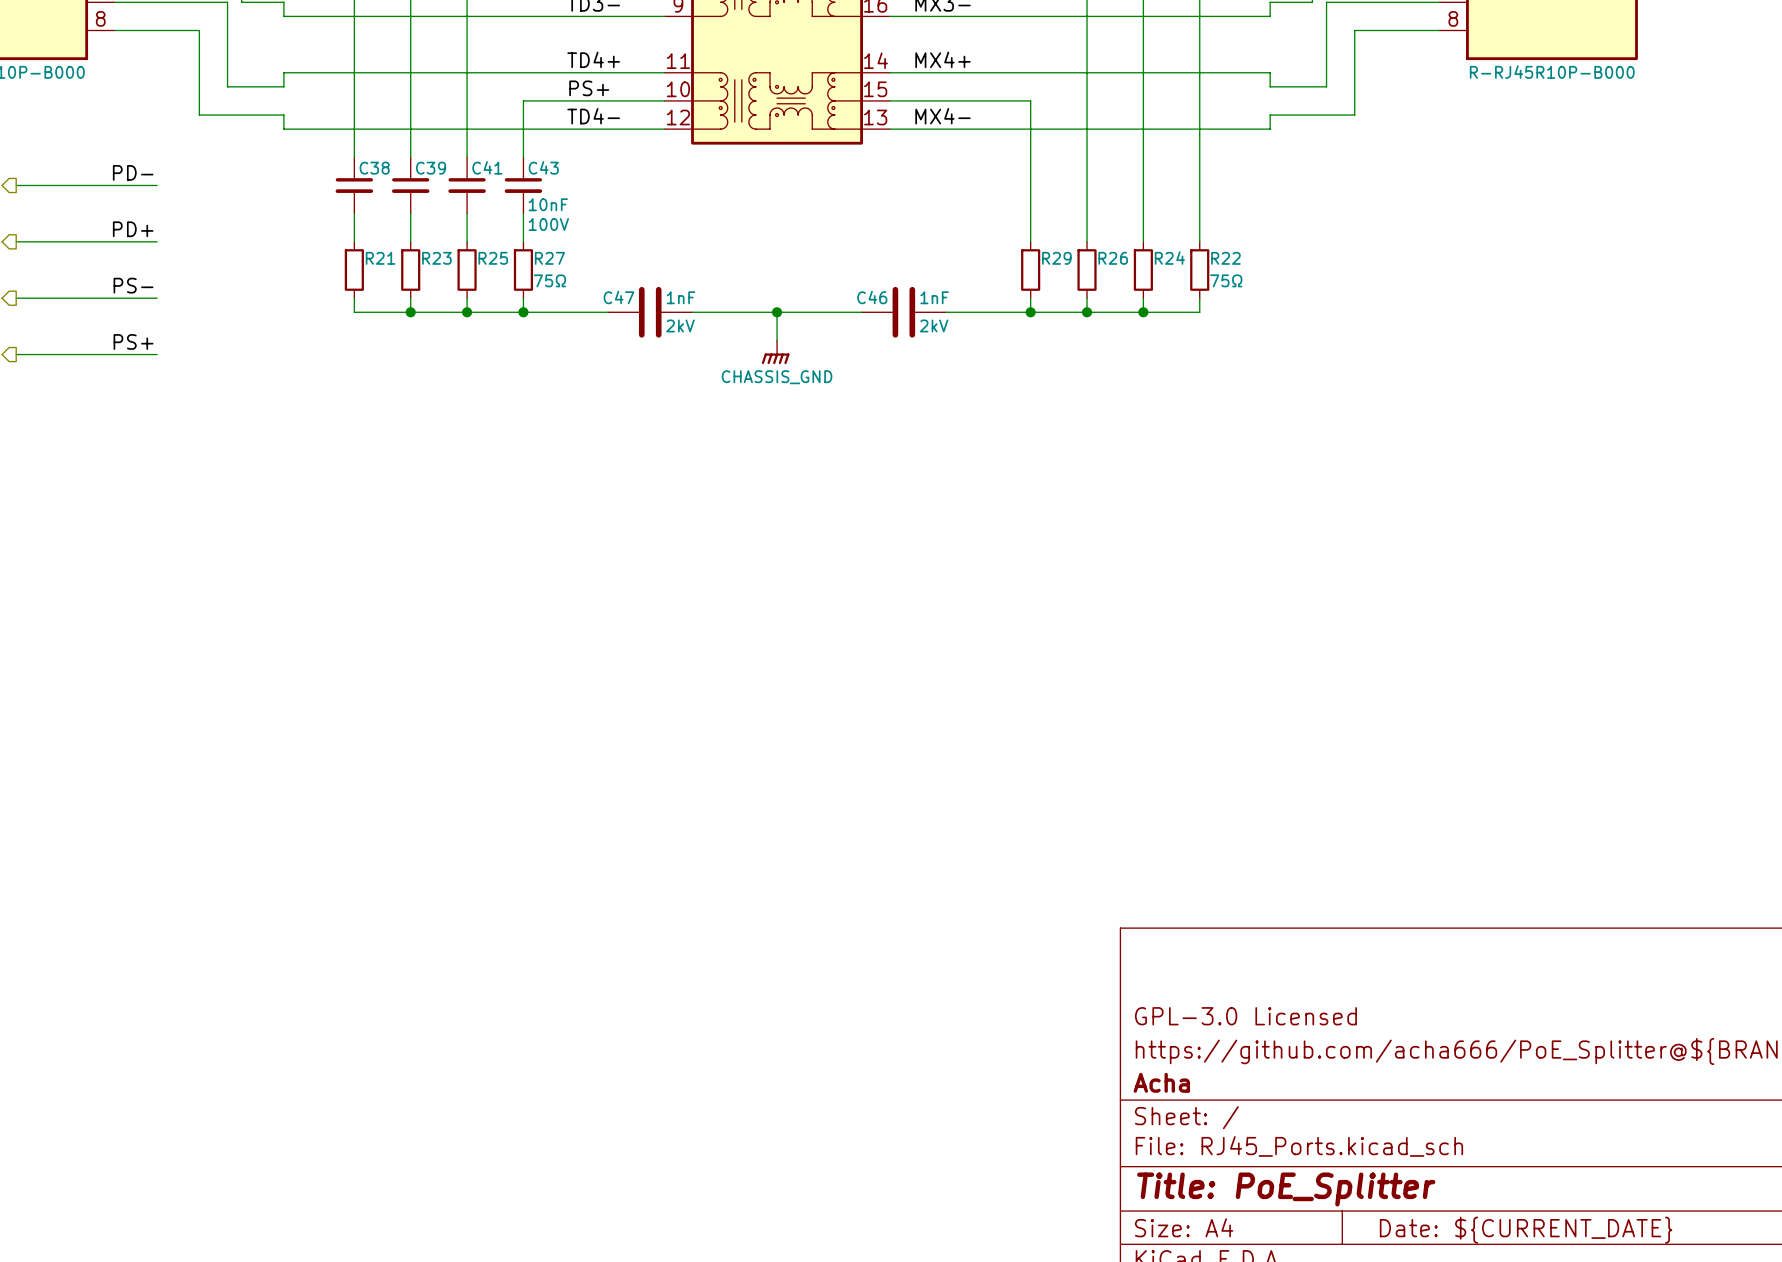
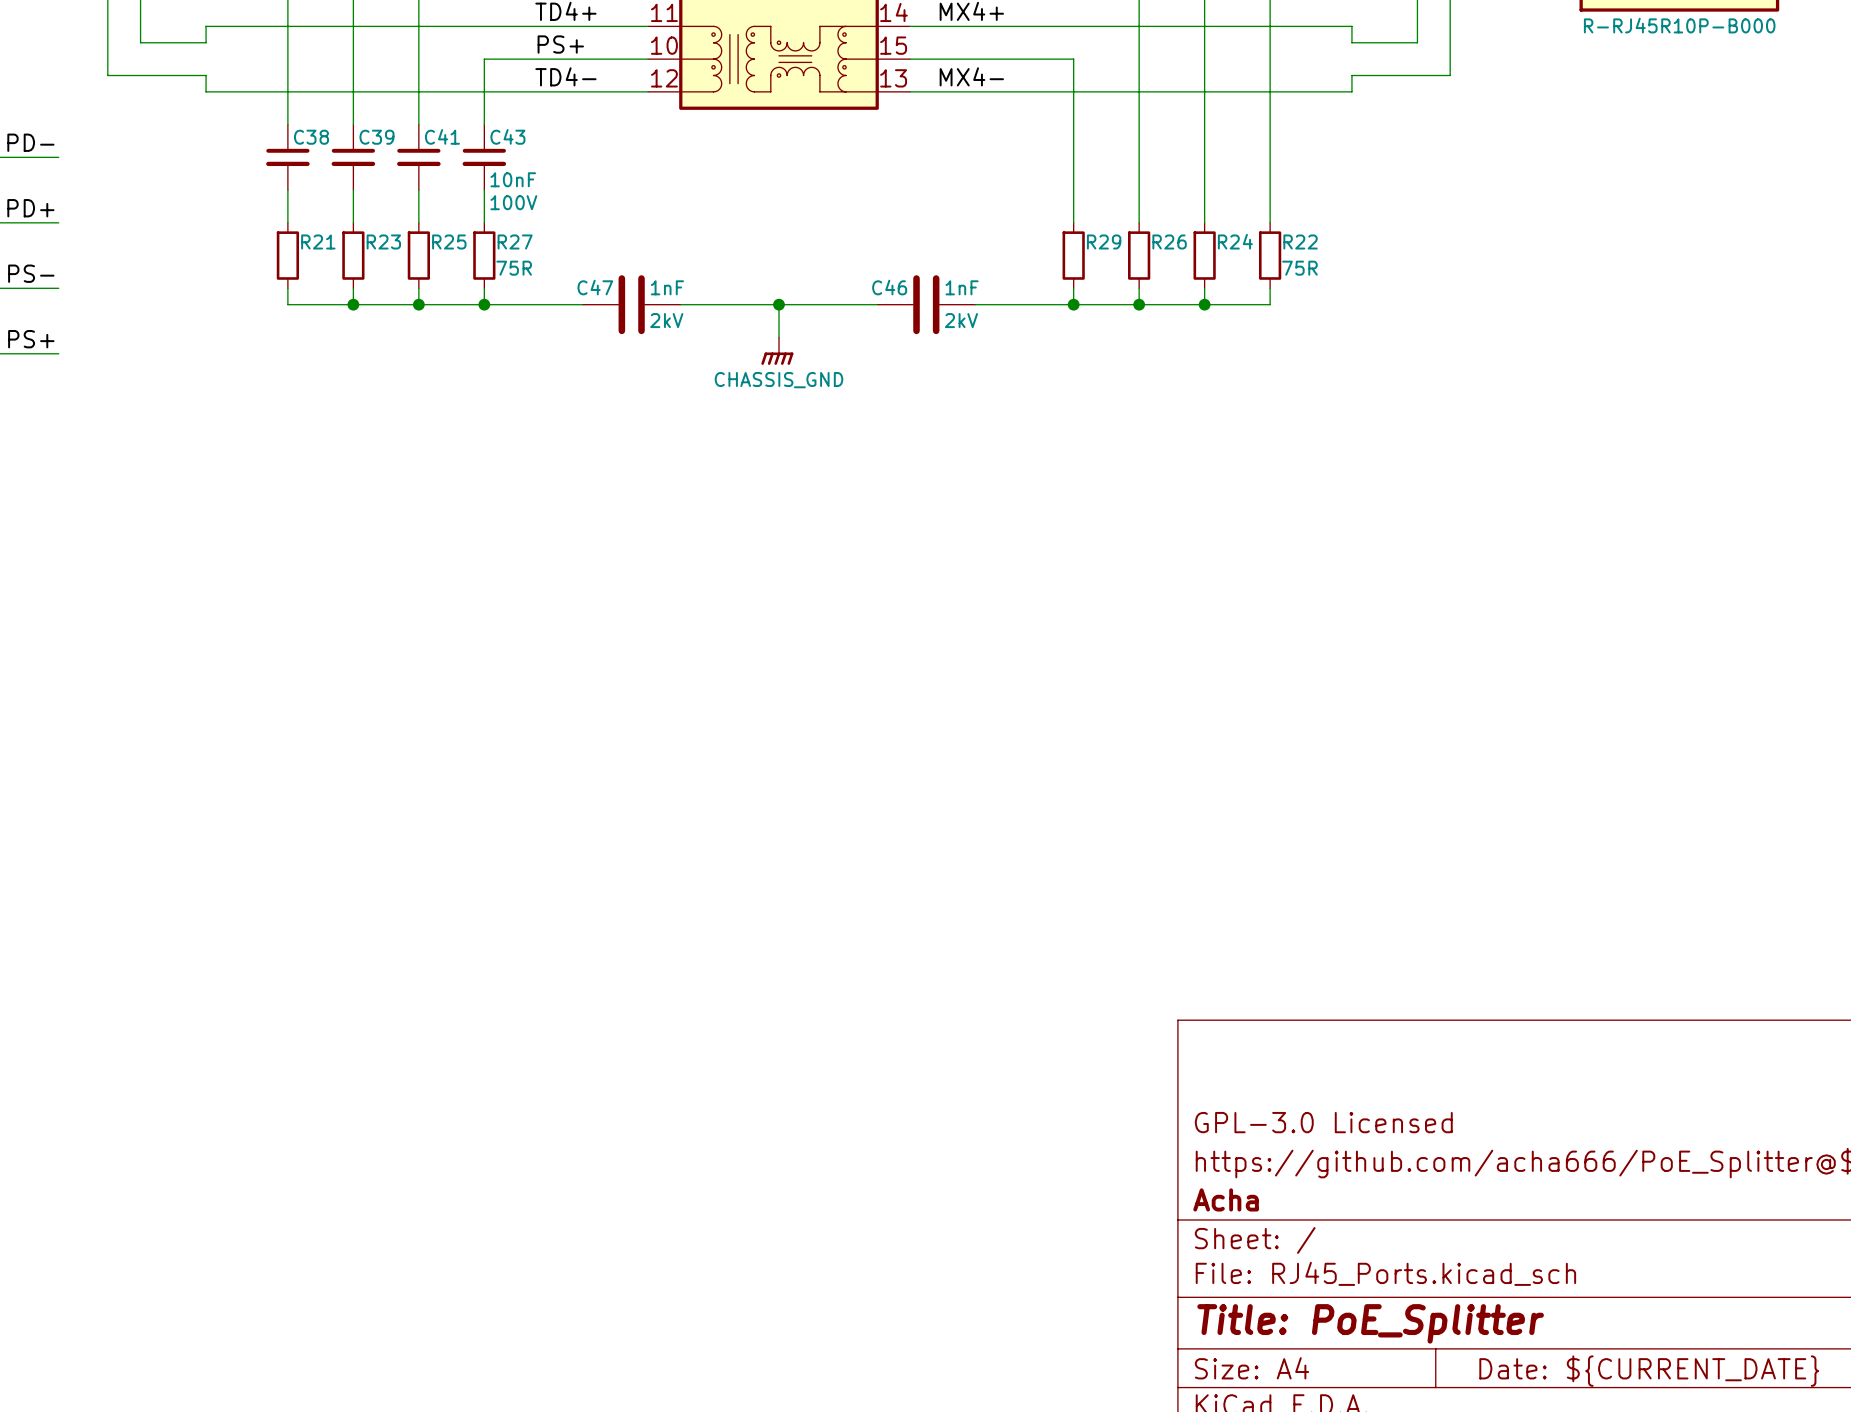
R27 value: 75Ω (549, 280) -> 75R (514, 268)
R22 value: 75Ω (1226, 280) -> 75R (1299, 268)

